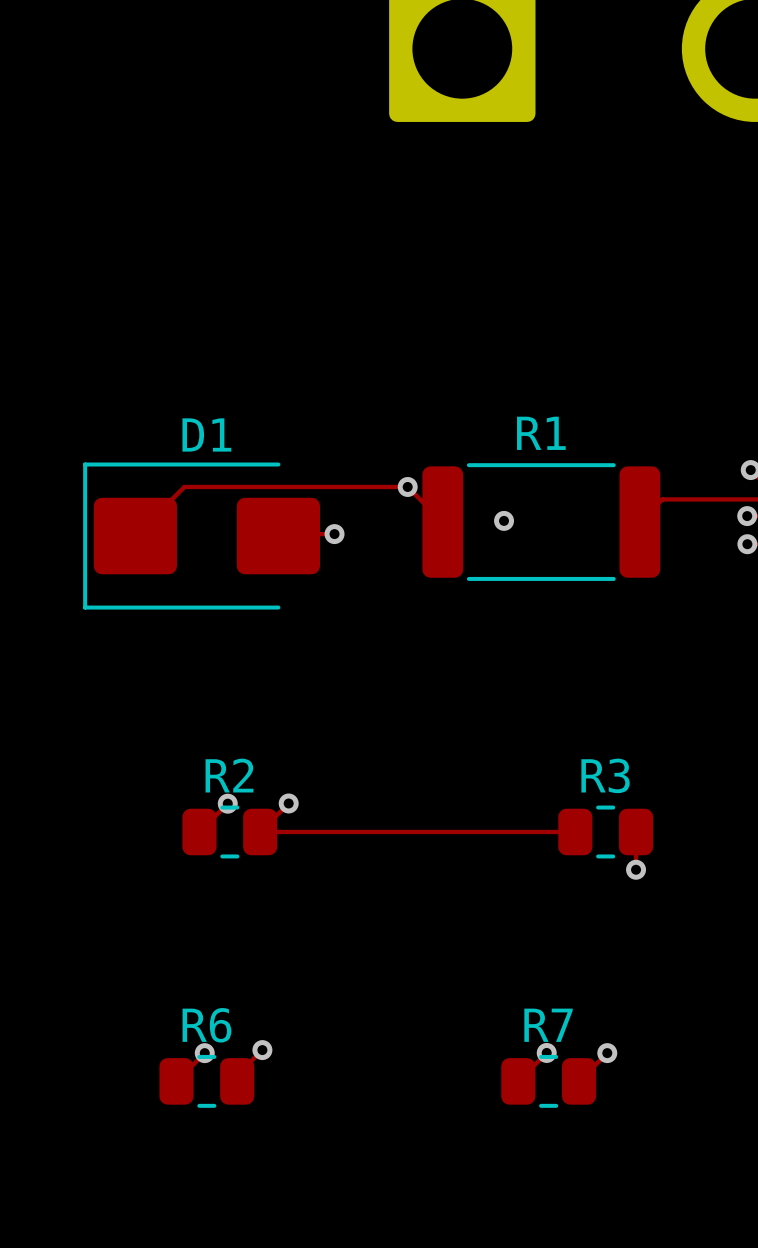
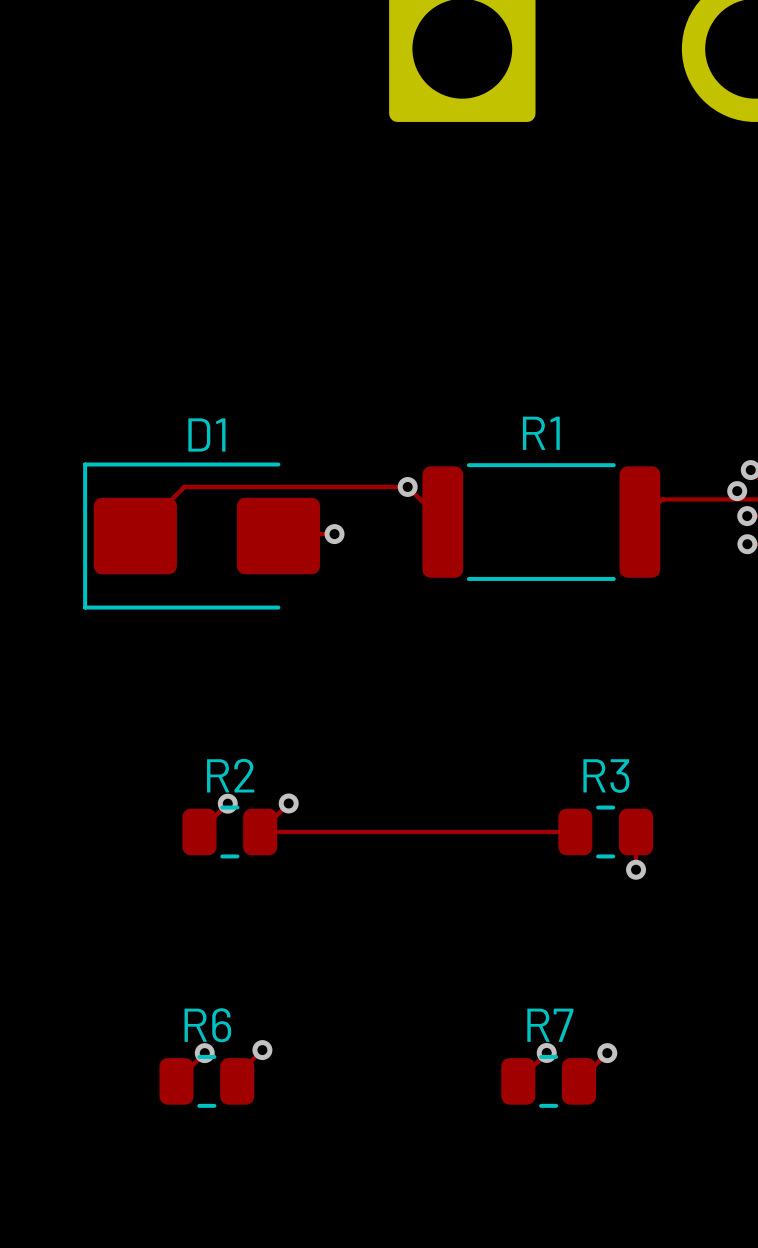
via: none -> (737, 491)
via: (504, 520) -> none

